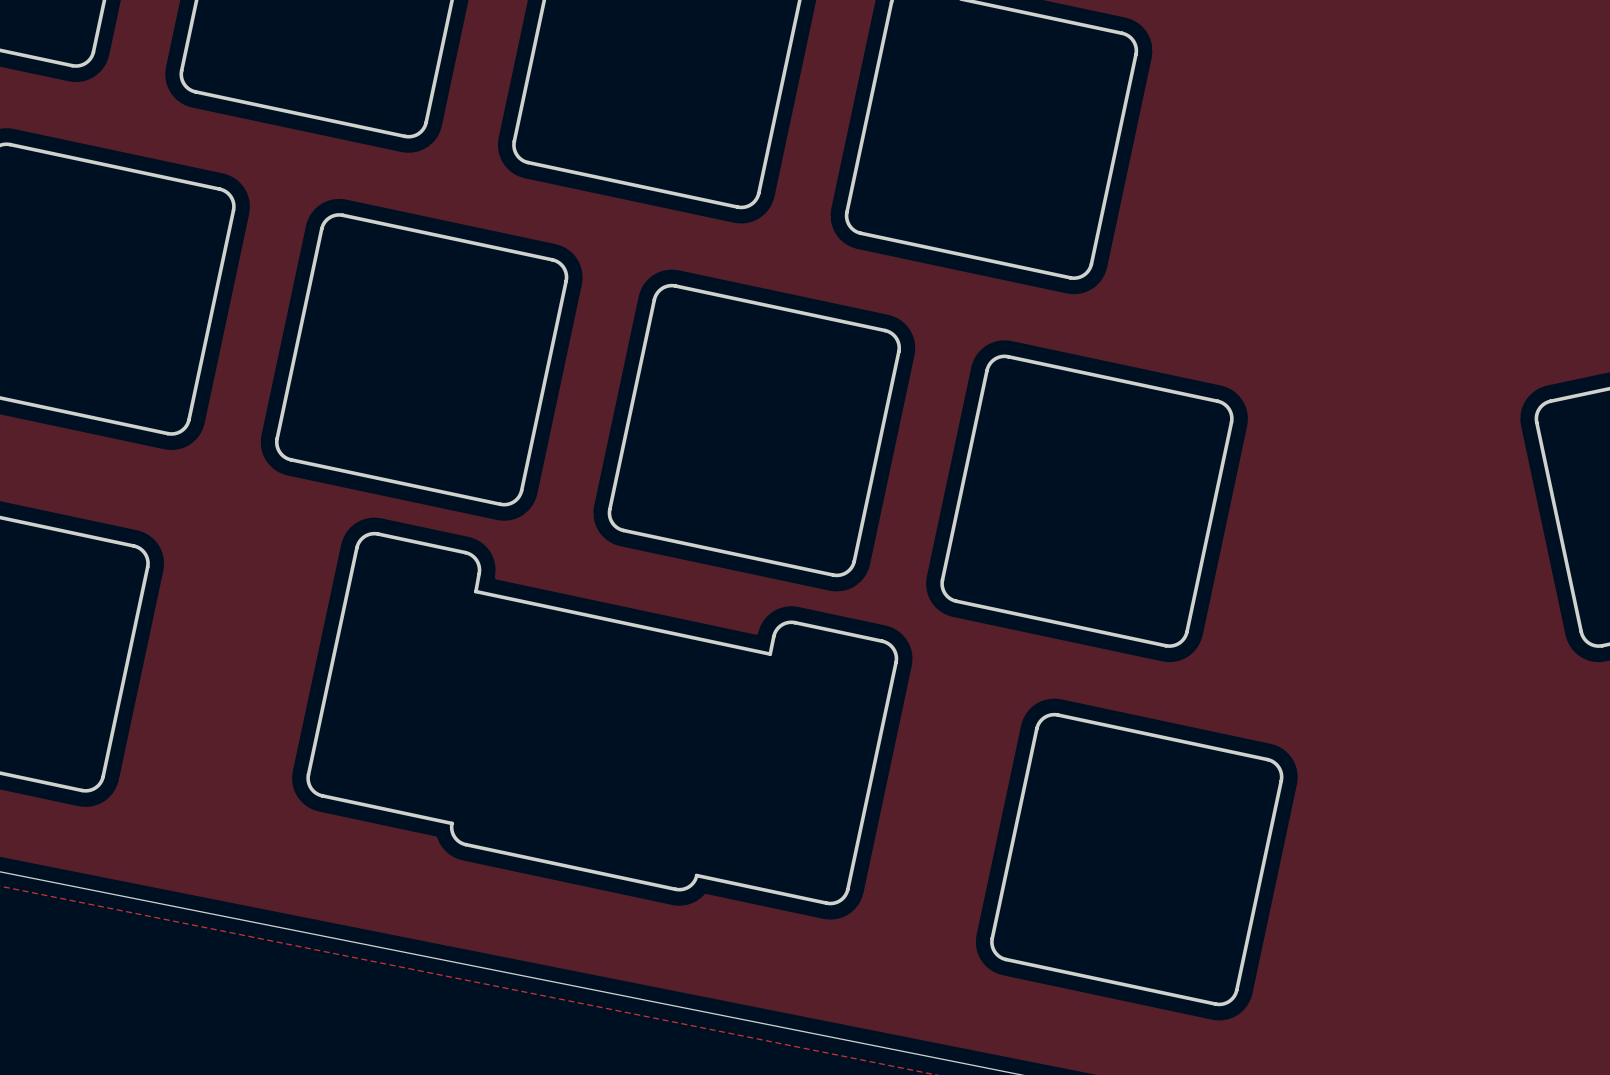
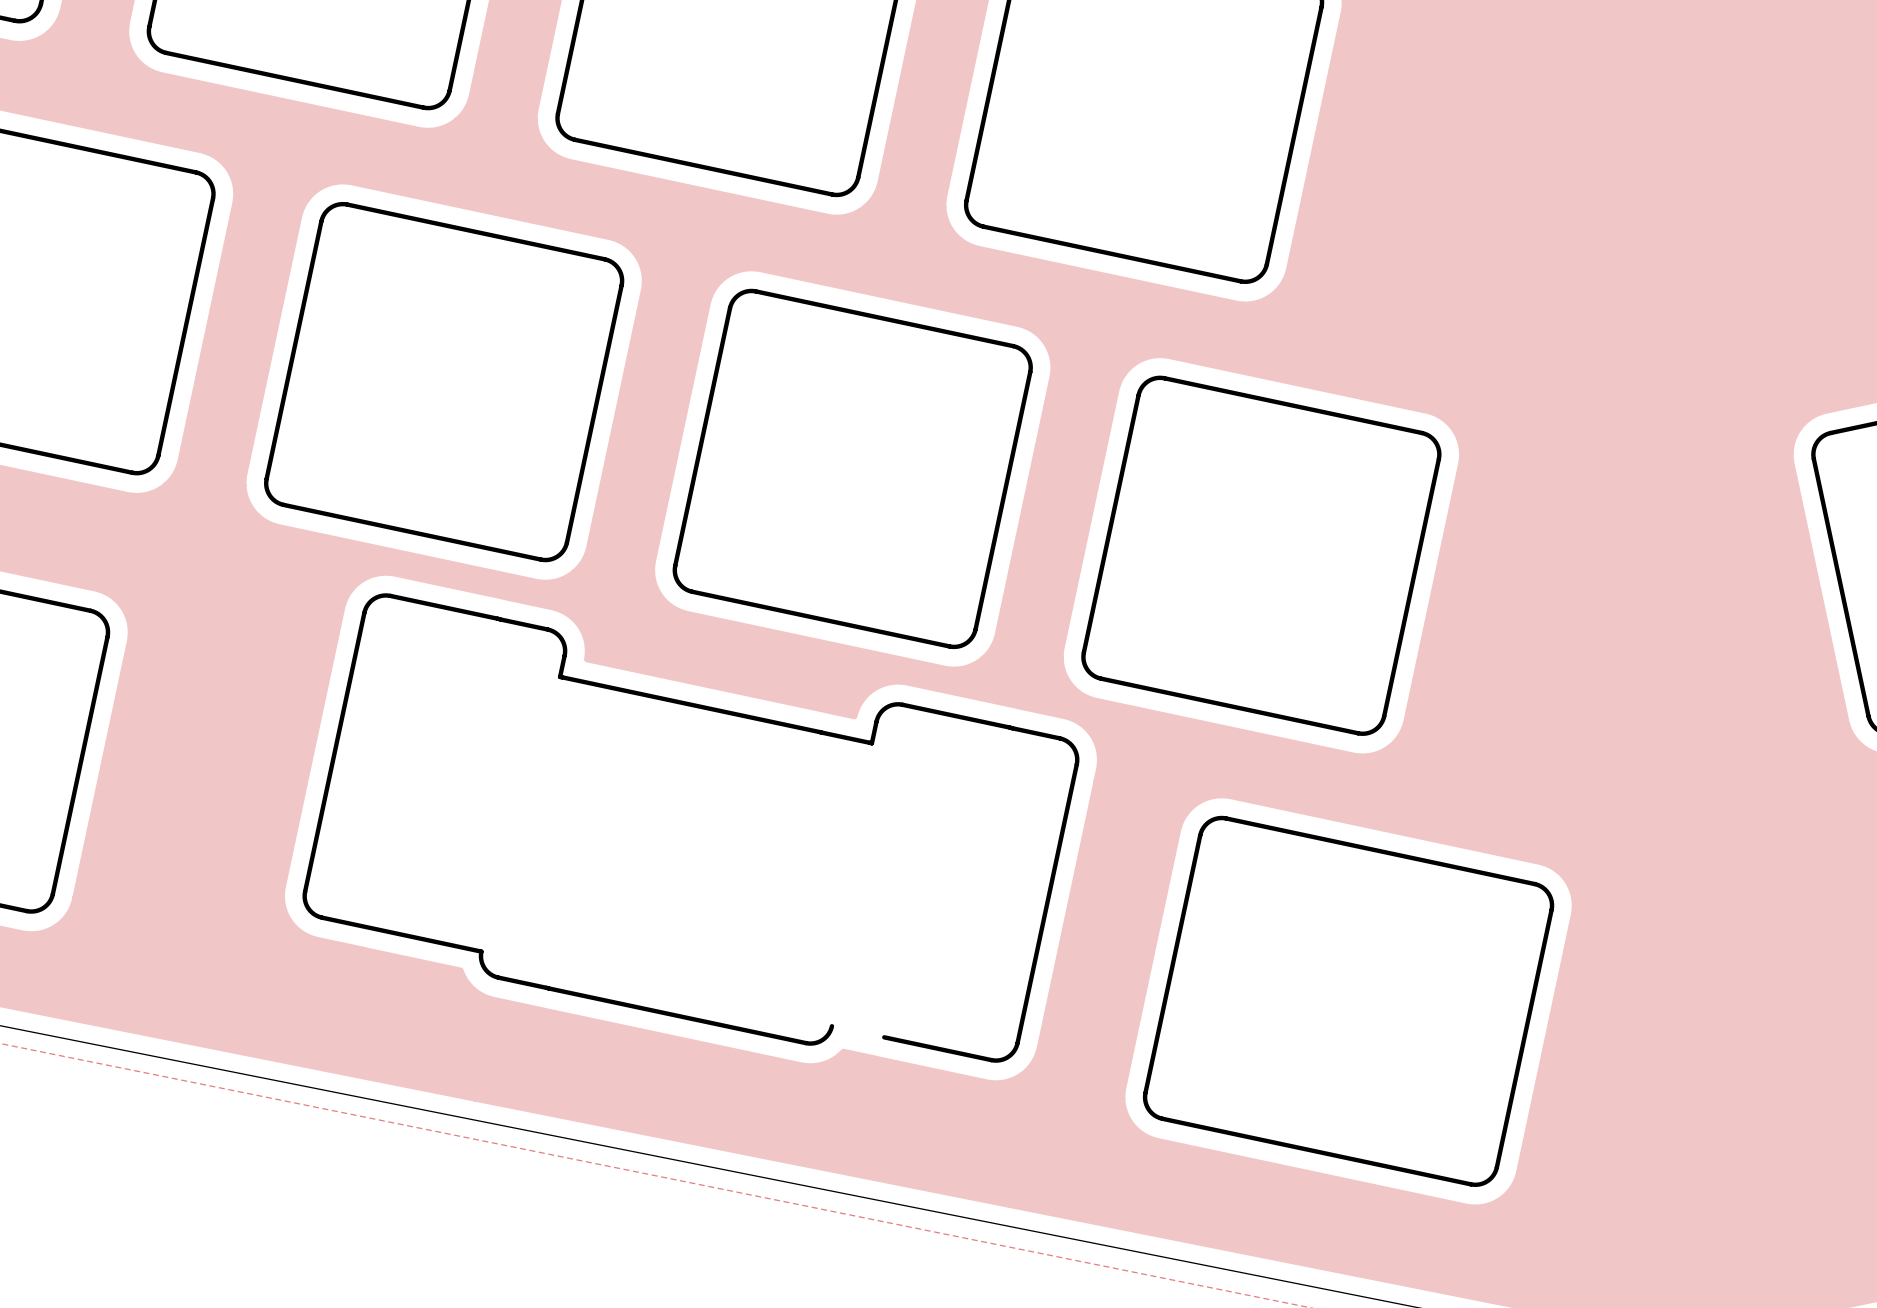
board edge: (1057, 715) (1267, 759) (1278, 767) (1281, 780) (1236, 990) (1229, 1001) (1215, 1004) (1006, 959) (994, 951) (992, 938) (1036, 728) (1044, 717) (1057, 715) -> (1226, 818) (1217, 818) (1209, 821) (1203, 827) (1200, 835) (1145, 1092) (1145, 1101) (1148, 1109) (1154, 1115) (1162, 1118) (1470, 1184) (1479, 1184) (1487, 1181) (1493, 1175) (1496, 1167) (1551, 910) (1551, 901) (1548, 893) (1542, 887) (1534, 884) (1226, 818)
board edge: (308, 774) (356, 547) (362, 537) (371, 533) (469, 554) (475, 558) (479, 566) (475, 591) (770, 654) (776, 630) (781, 625) (790, 622) (882, 641) (893, 648) (896, 660) (847, 889) (840, 900) (826, 903) -> (305, 891) (364, 612) (371, 600) (381, 595) (390, 595) (553, 631) (559, 636) (564, 646) (560, 676) (871, 743) (879, 713) (888, 706) (896, 704) (1062, 739) (1070, 743) (1075, 750) (1076, 764) (1016, 1046) (1010, 1055) (997, 1060) (941, 1049)
board edge: (465, 844) (675, 889) (689, 886) (696, 875) (779, 893) -> (498, 977) (805, 1043) (814, 1043) (822, 1040) (828, 1034) (831, 1026)

